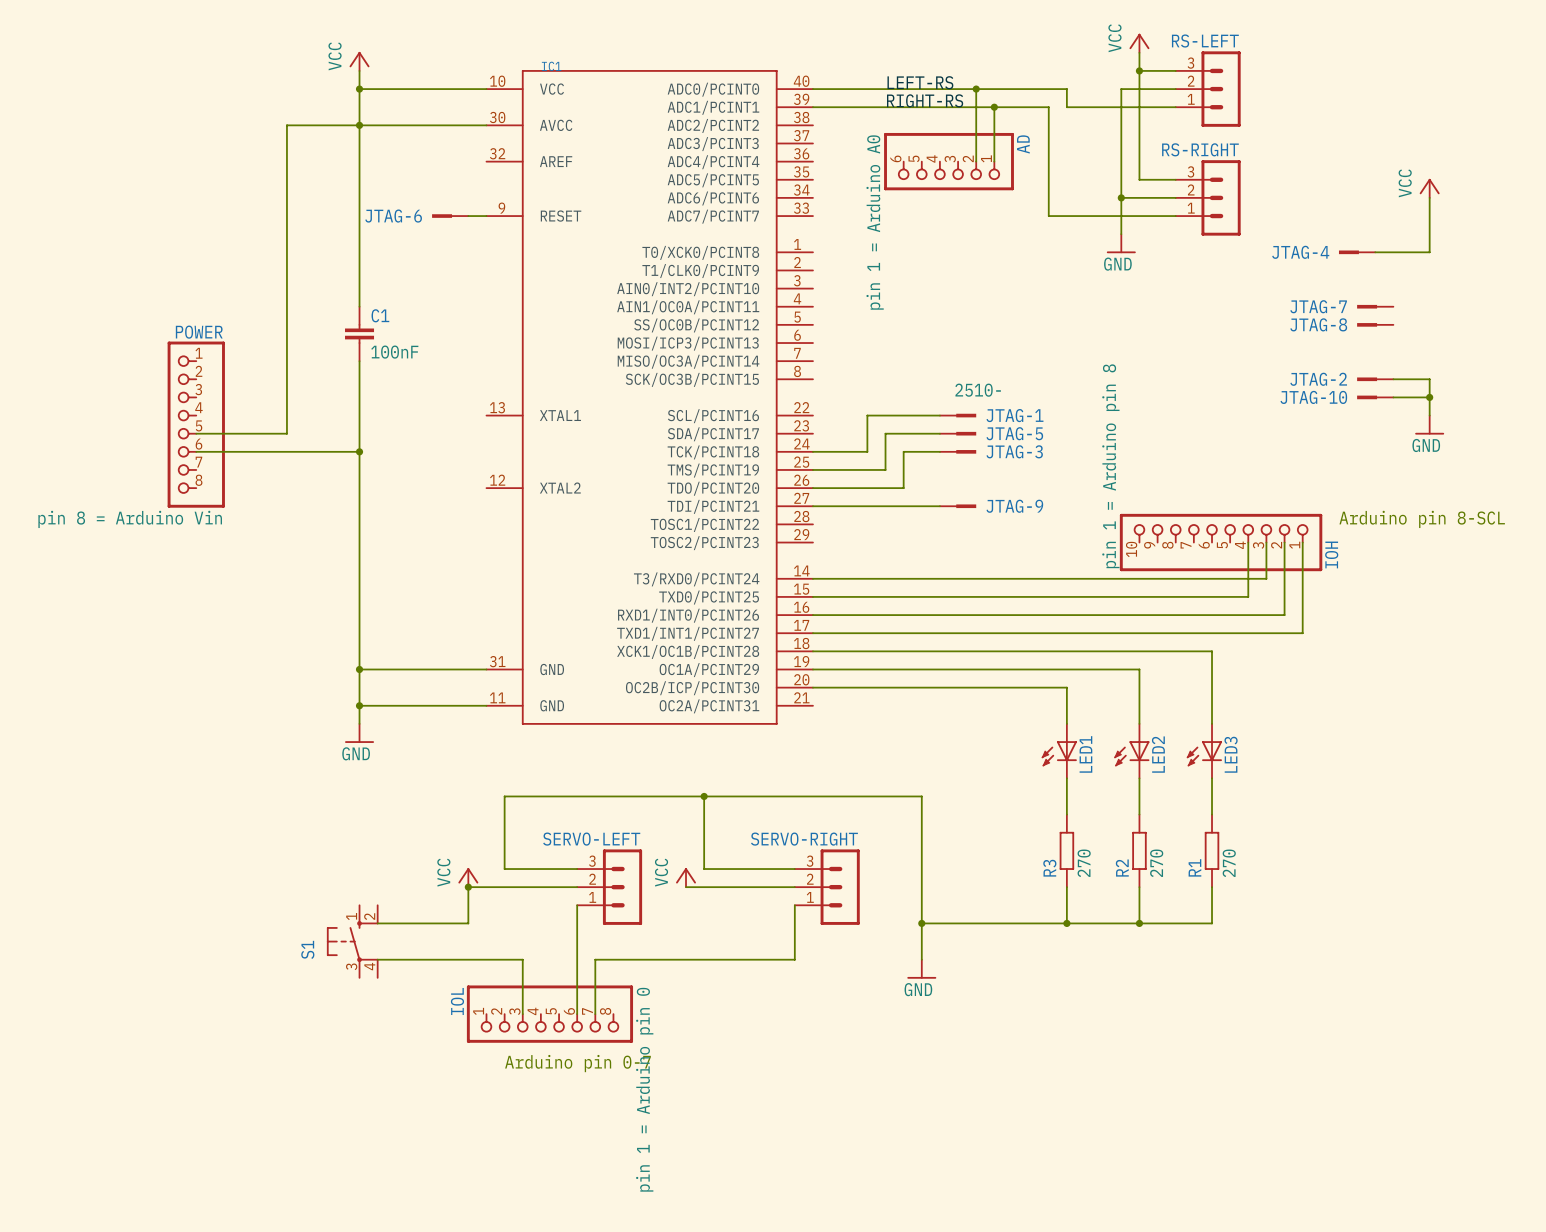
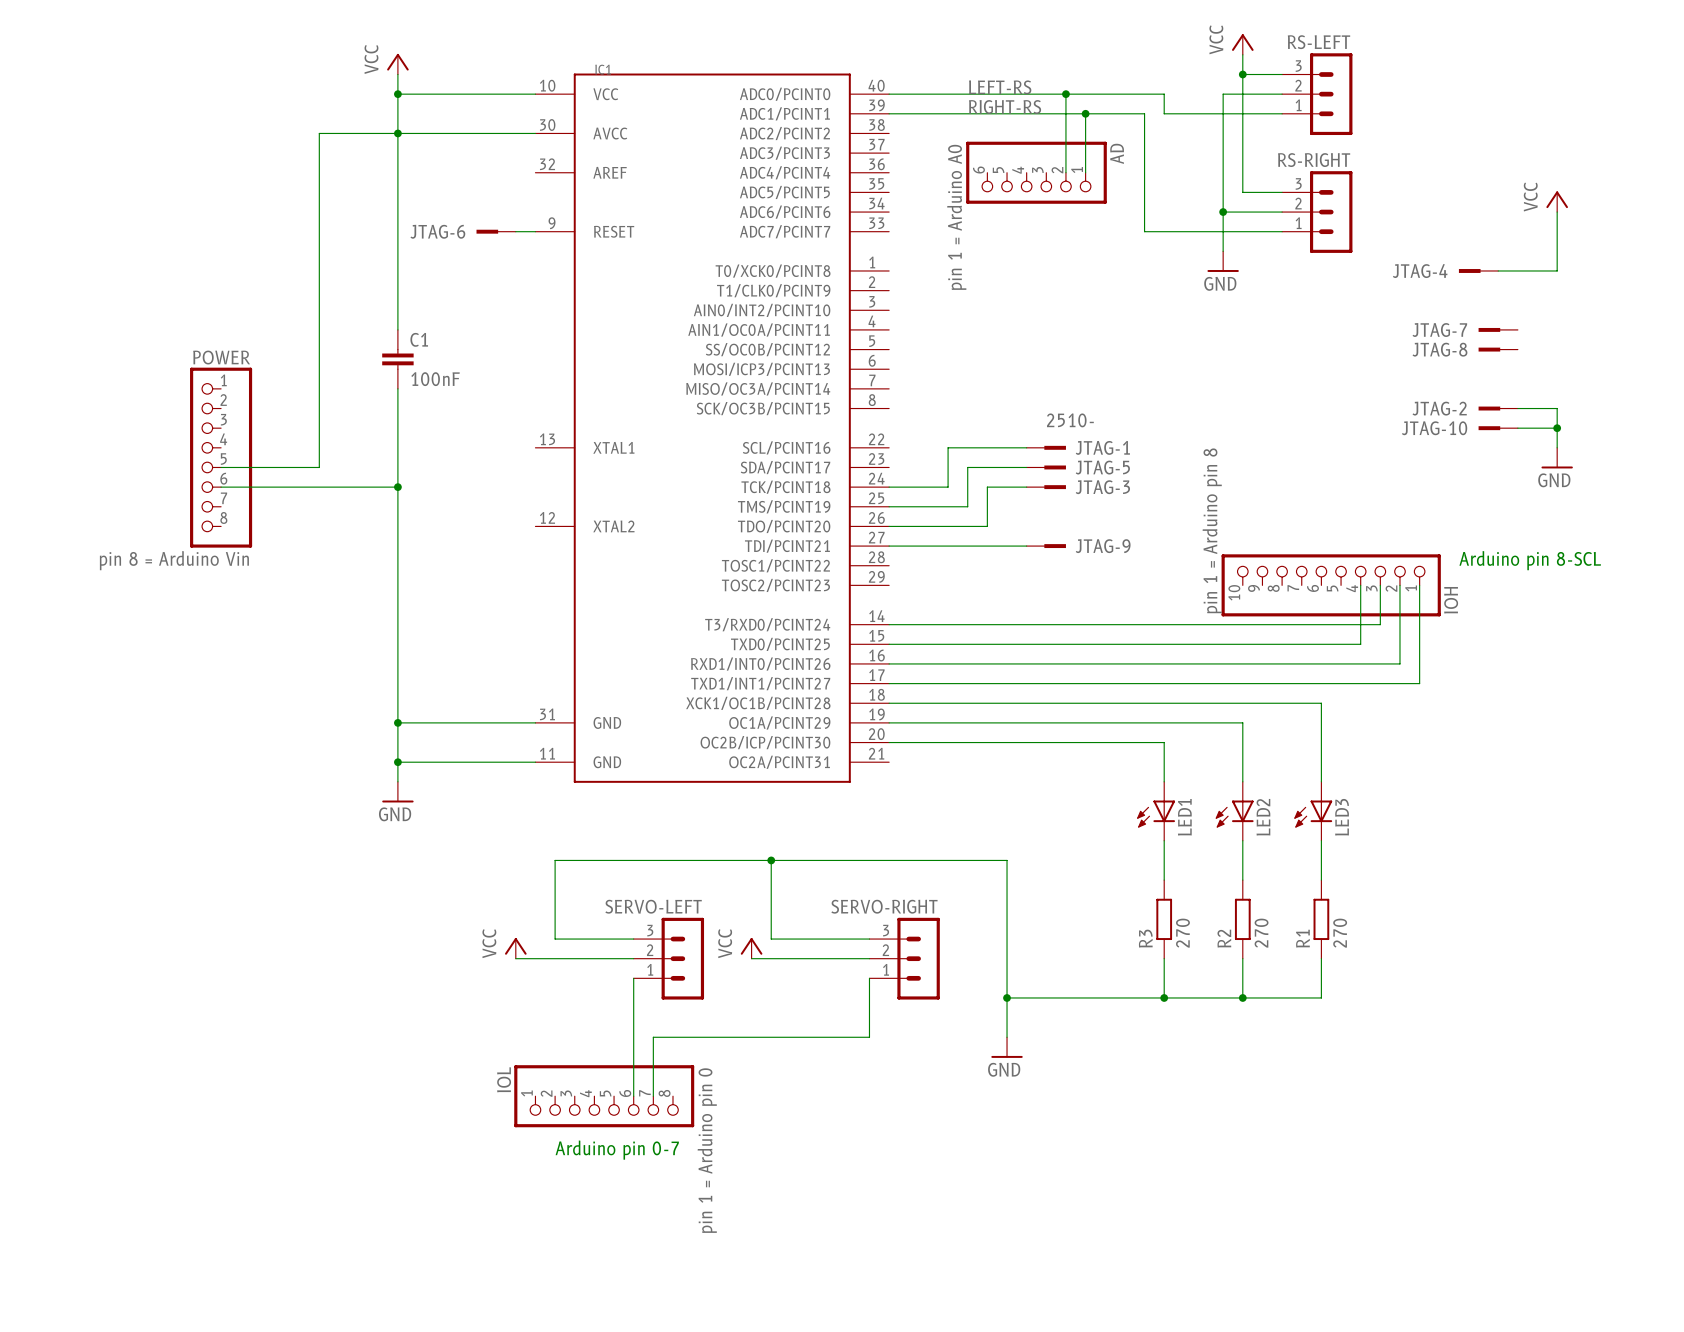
wire: (468, 887) (468, 923) (377, 923) -> none
junction: (468, 887) -> none
S1: (352, 941) -> none
wire: (377, 959) (522, 959) (522, 1014) -> none

